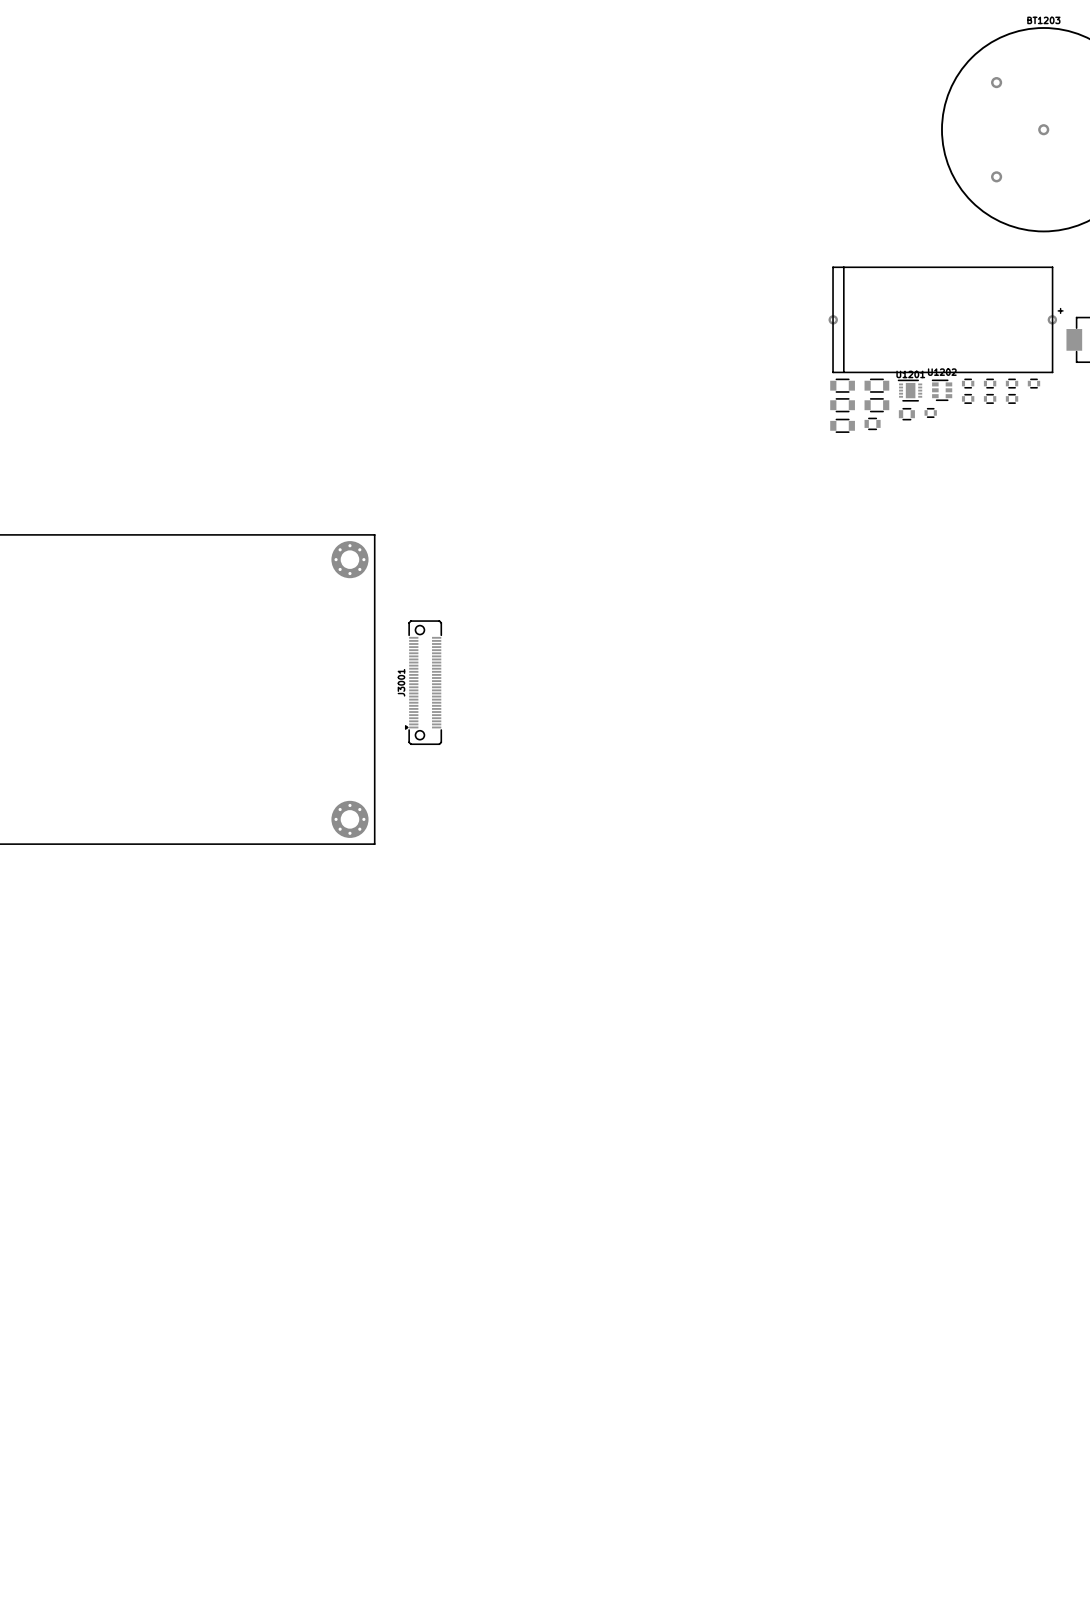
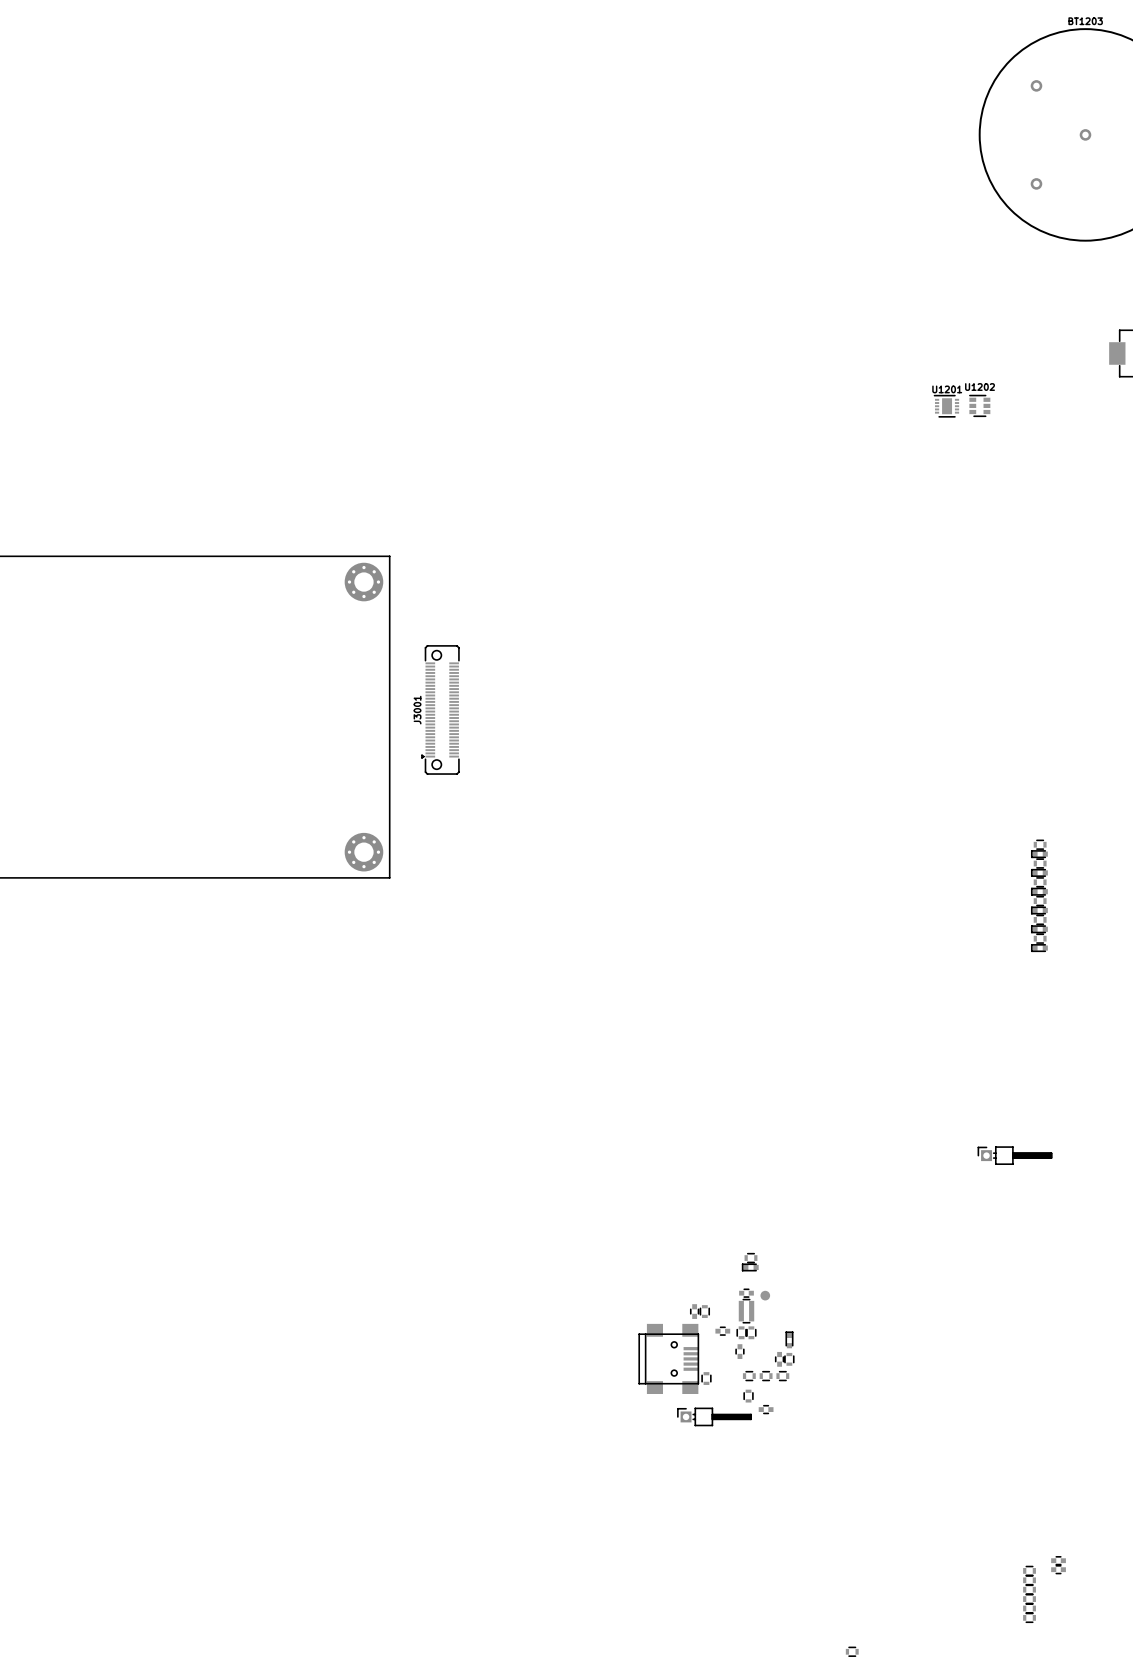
part: (942, 319) -> none
part: (968, 383) -> none
part: (990, 383) -> none
part: (1012, 383) -> none
part: (1033, 383) -> none
part: (842, 385) -> none
part: (876, 385) -> none
part: (968, 398) -> none
part: (990, 398) -> none
part: (1012, 398) -> none
part: (842, 405) -> none
part: (876, 405) -> none
part: (930, 412) -> none
part: (906, 414) -> none
part: (872, 423) -> none
part: (842, 425) -> none
part: none -> (1040, 844)
part: none -> (1039, 854)
part: none -> (1040, 863)
part: none -> (1039, 872)
part: none -> (1040, 882)
part: none -> (1039, 891)
part: none -> (1040, 901)
part: none -> (1039, 910)
part: none -> (1040, 919)
part: none -> (1039, 929)
part: none -> (1040, 938)
part: none -> (1039, 948)
part: none -> (1014, 1155)
part: none -> (750, 1258)
part: none -> (750, 1267)
part: none -> (746, 1293)
part: none -> (765, 1295)
part: none -> (746, 1311)
part: none -> (694, 1311)
part: none -> (704, 1311)
part: none -> (722, 1331)
part: none -> (741, 1332)
part: none -> (751, 1332)
part: none -> (789, 1340)
part: none -> (739, 1351)
part: none -> (668, 1358)
part: none -> (779, 1359)
part: none -> (789, 1359)
part: none -> (749, 1376)
part: none -> (766, 1376)
part: none -> (782, 1376)
part: none -> (706, 1378)
part: none -> (748, 1396)
part: none -> (766, 1409)
part: none -> (714, 1416)
part: none -> (1058, 1560)
part: none -> (1058, 1569)
part: none -> (1029, 1570)
part: none -> (1029, 1580)
part: none -> (1029, 1589)
part: none -> (1029, 1599)
part: none -> (1029, 1608)
part: none -> (1029, 1617)
part: none -> (852, 1651)

